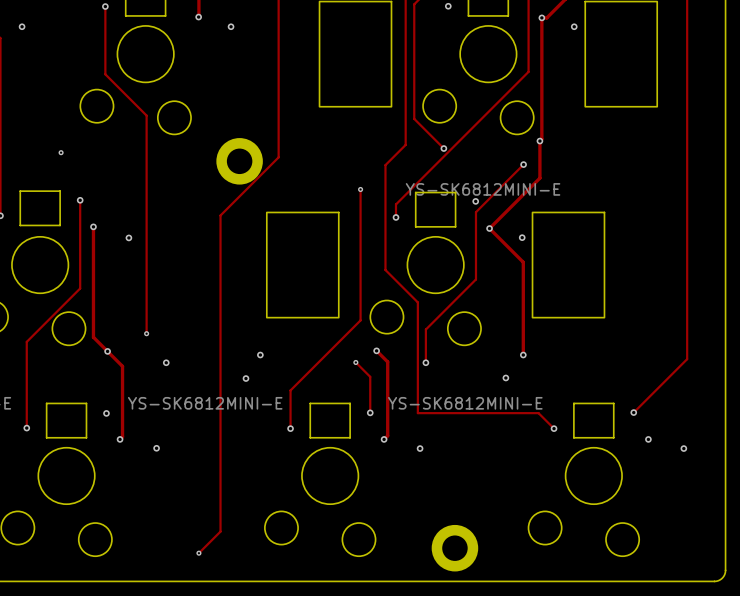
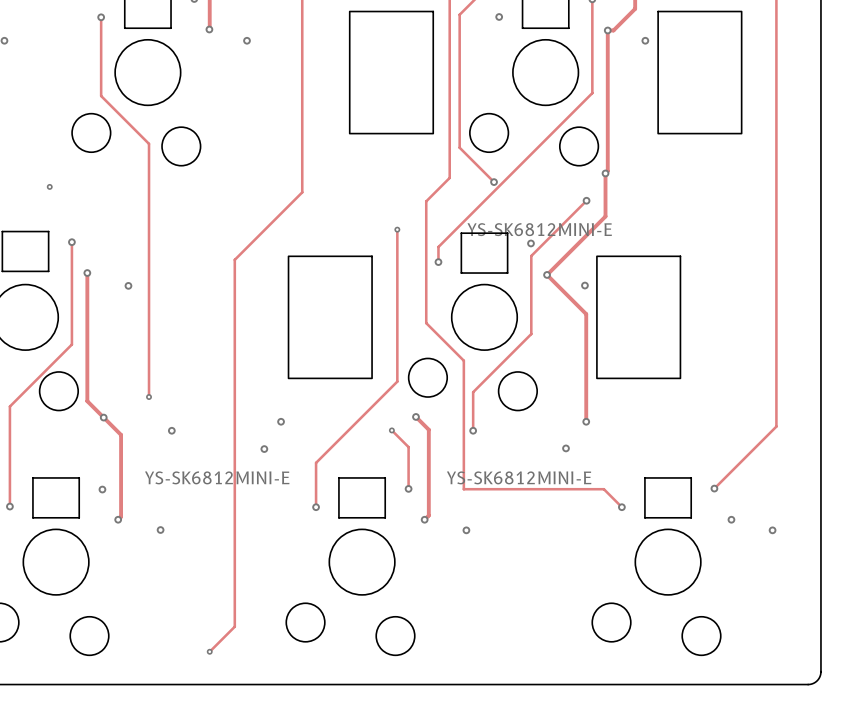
part: (239, 161) -> none
part: (454, 548) -> none

